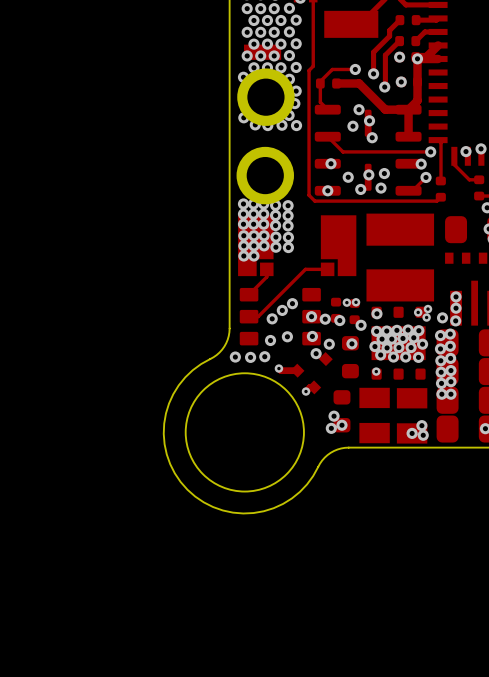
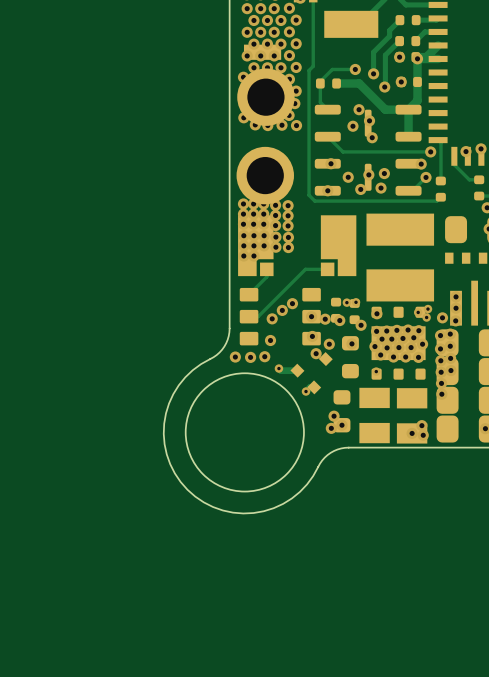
via: (287, 336) -> none
via: (450, 381) -> none
via: (450, 394) -> none

